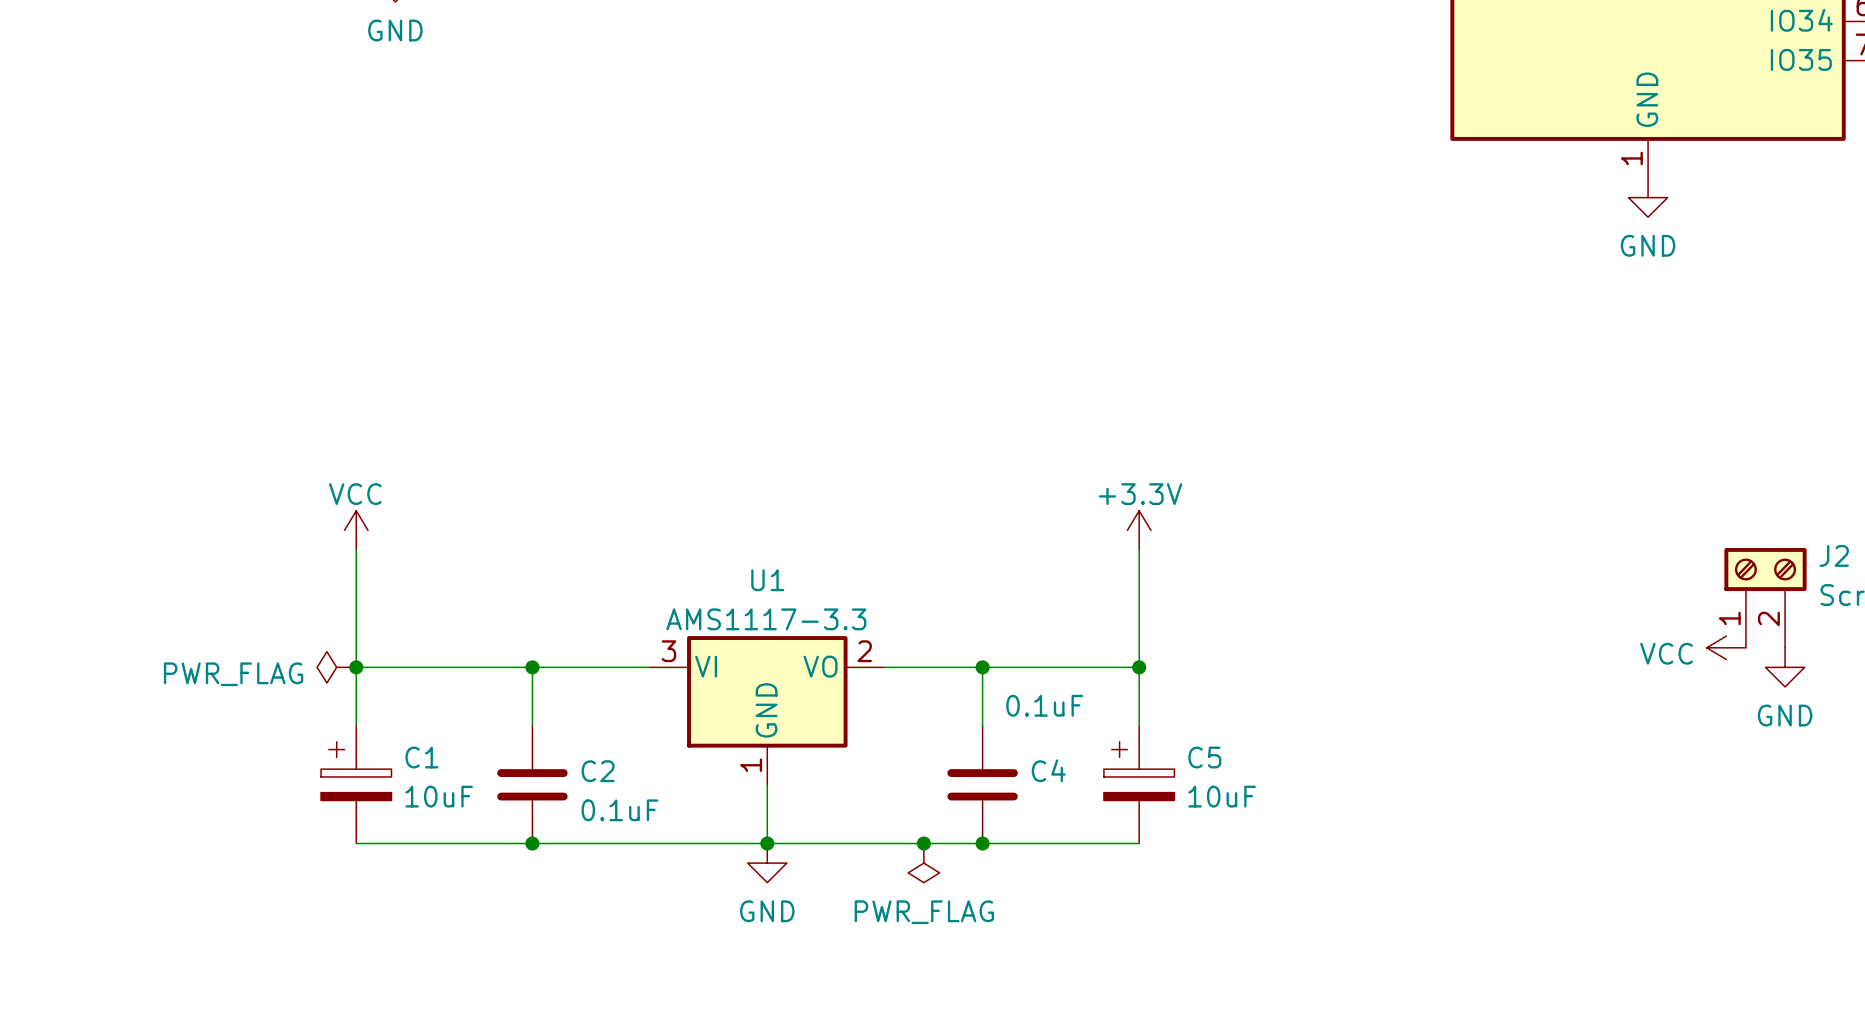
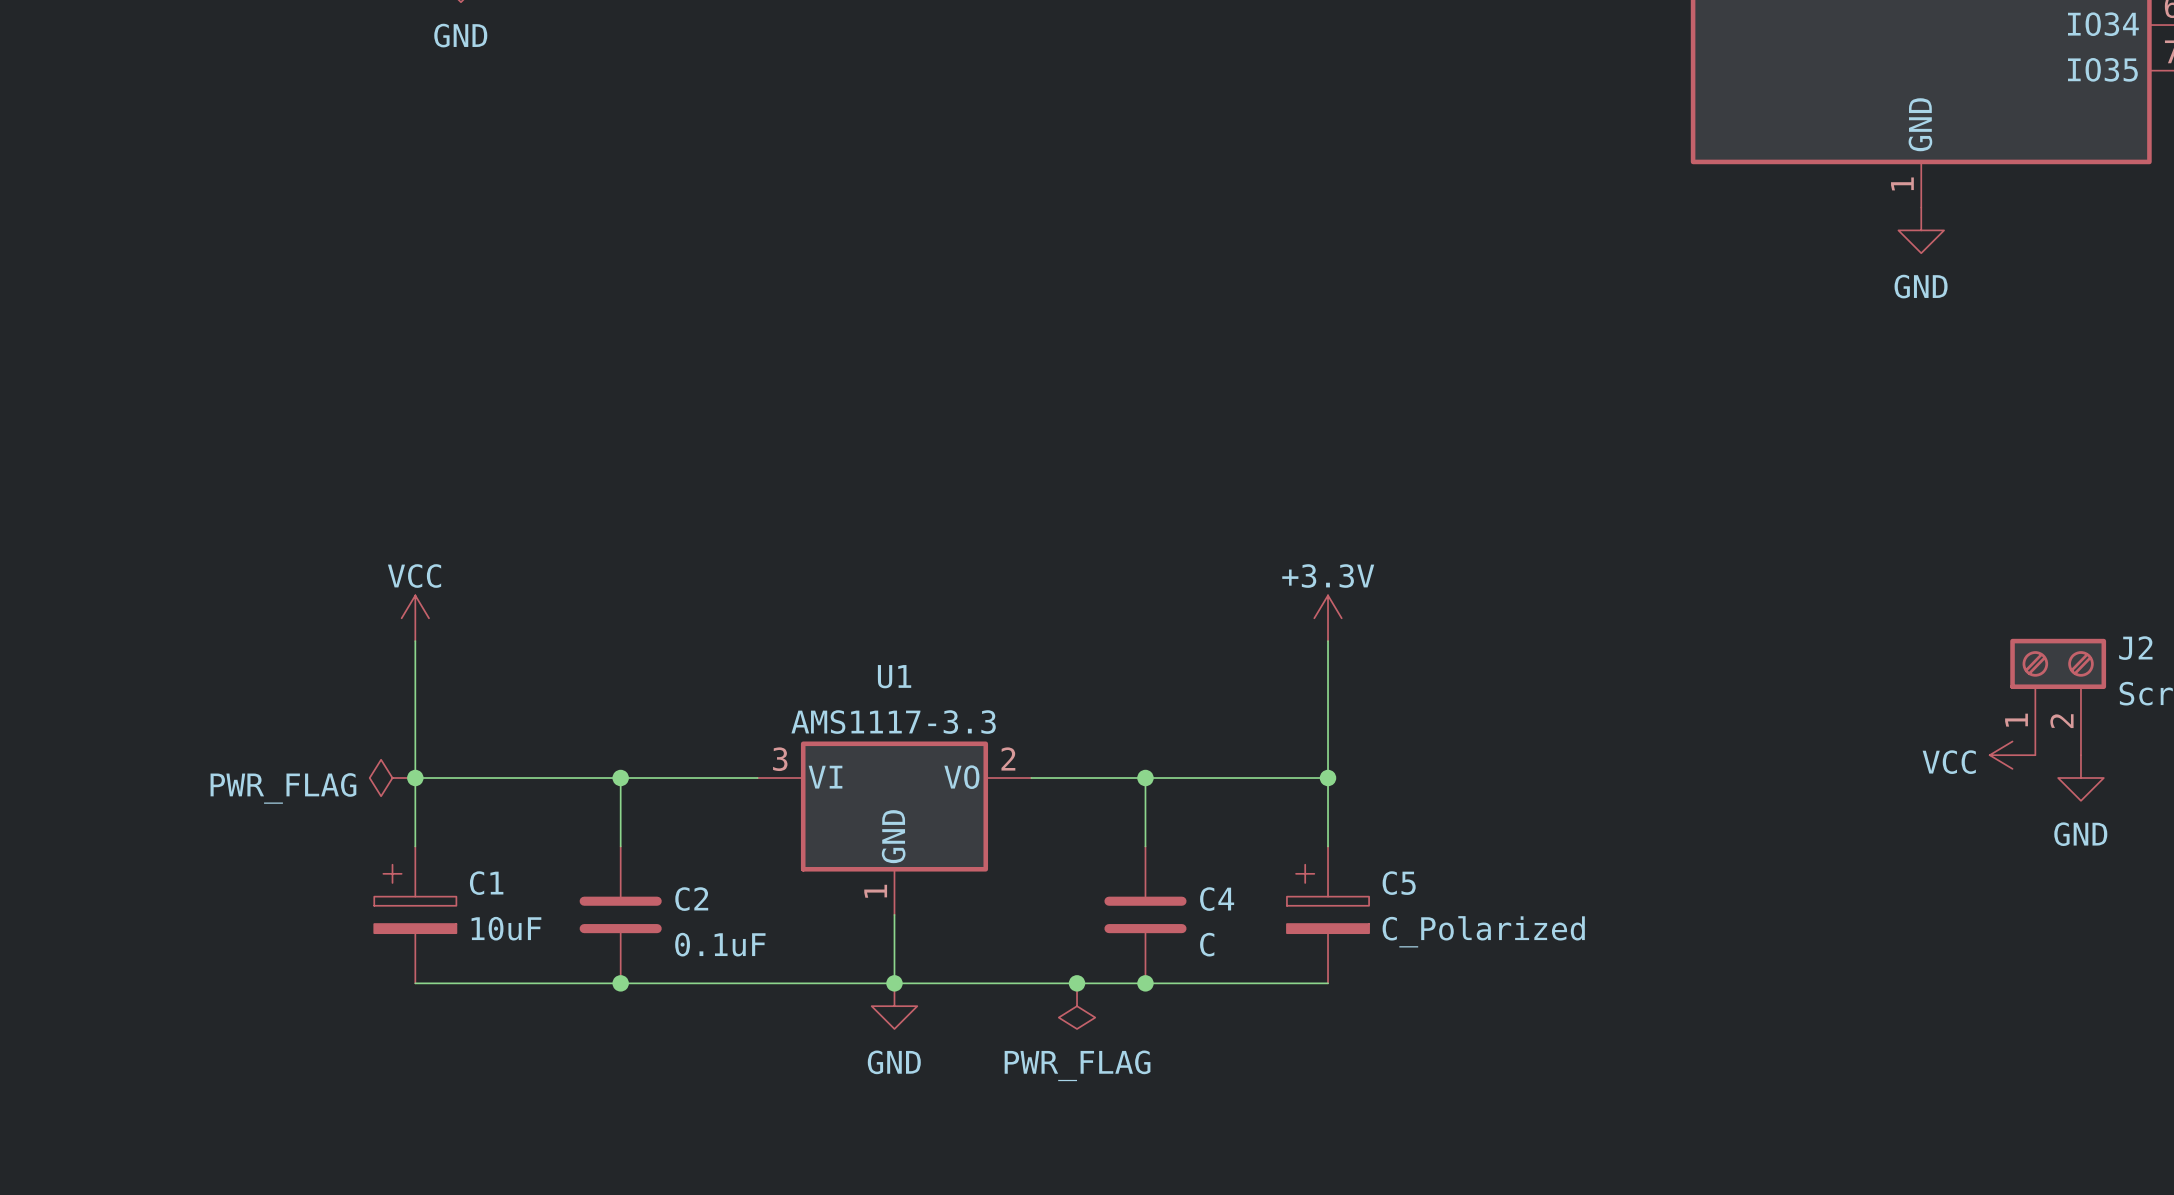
C4 value: 0.1uF (1044, 705) -> C (1207, 944)
C5 value: 10uF (1222, 796) -> C_Polarized (1483, 931)

